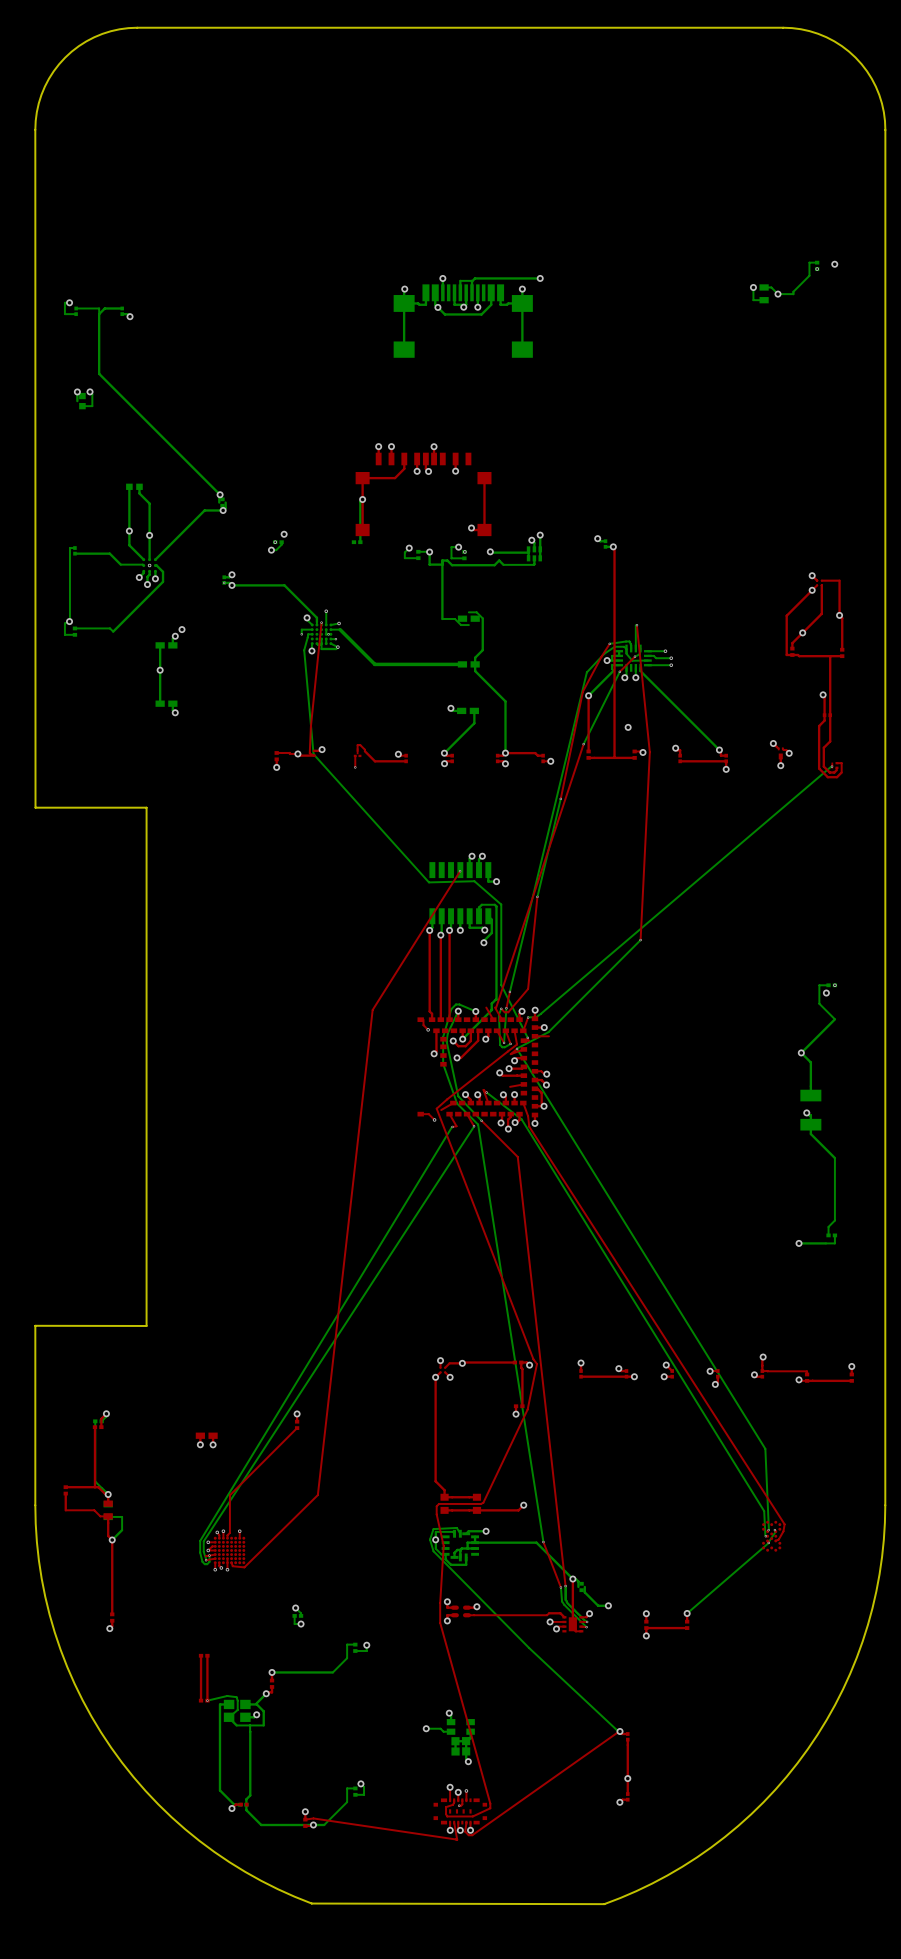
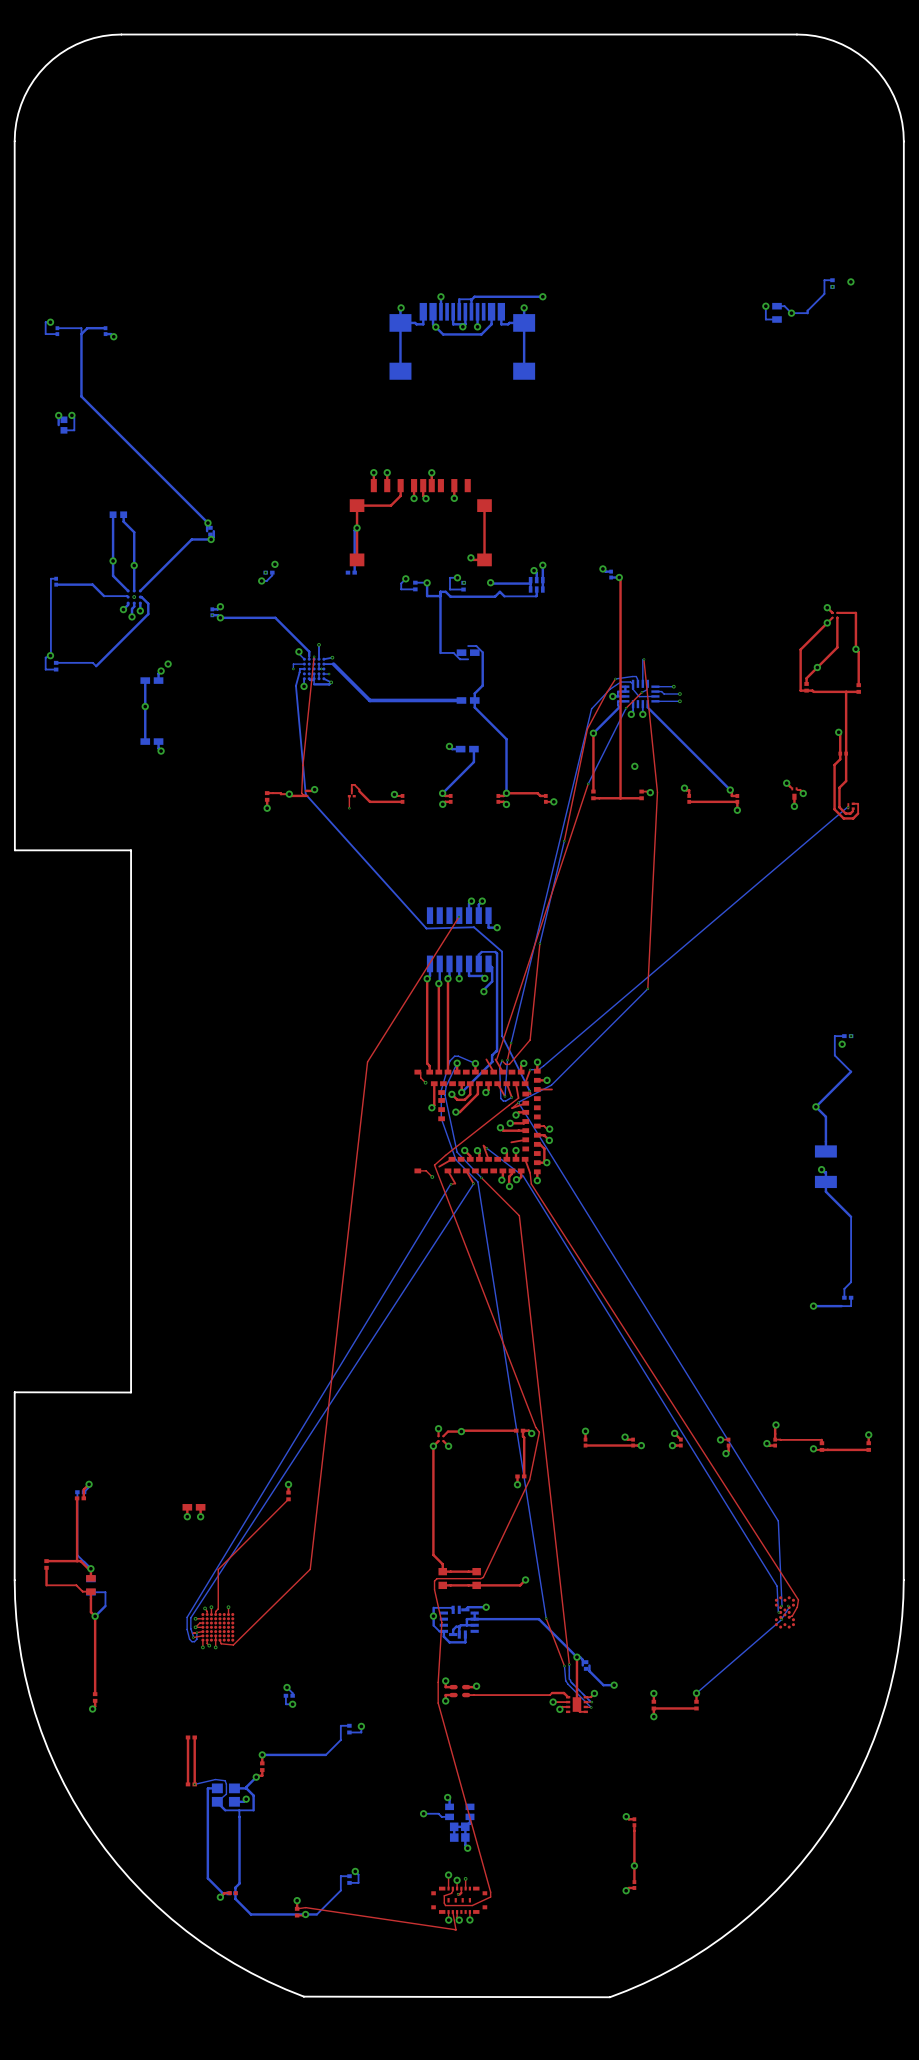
bottom track: (460, 1533) (456, 1527) (433, 1529) (430, 1539) (433, 1551) (529, 1648) (620, 1731) -> none
top track: (620, 1731) (472, 1835) (468, 1835) (465, 1831) (466, 1822) -> none

